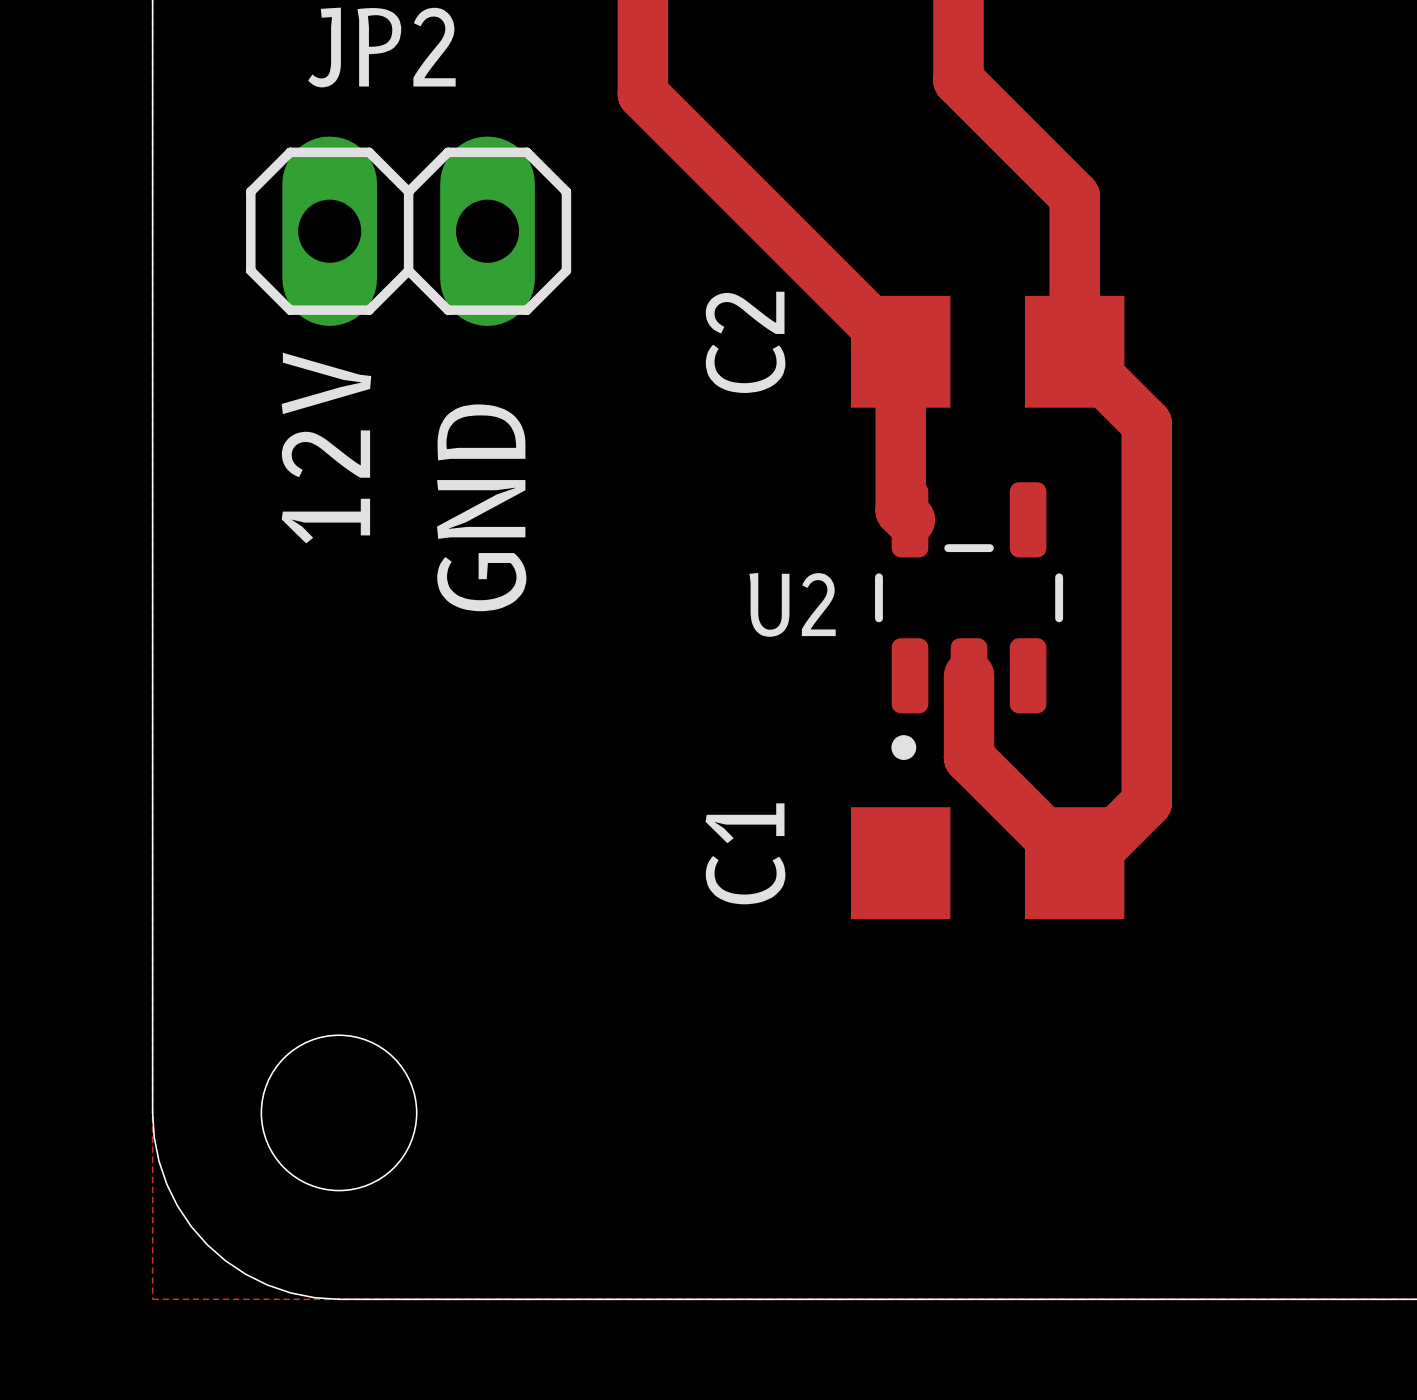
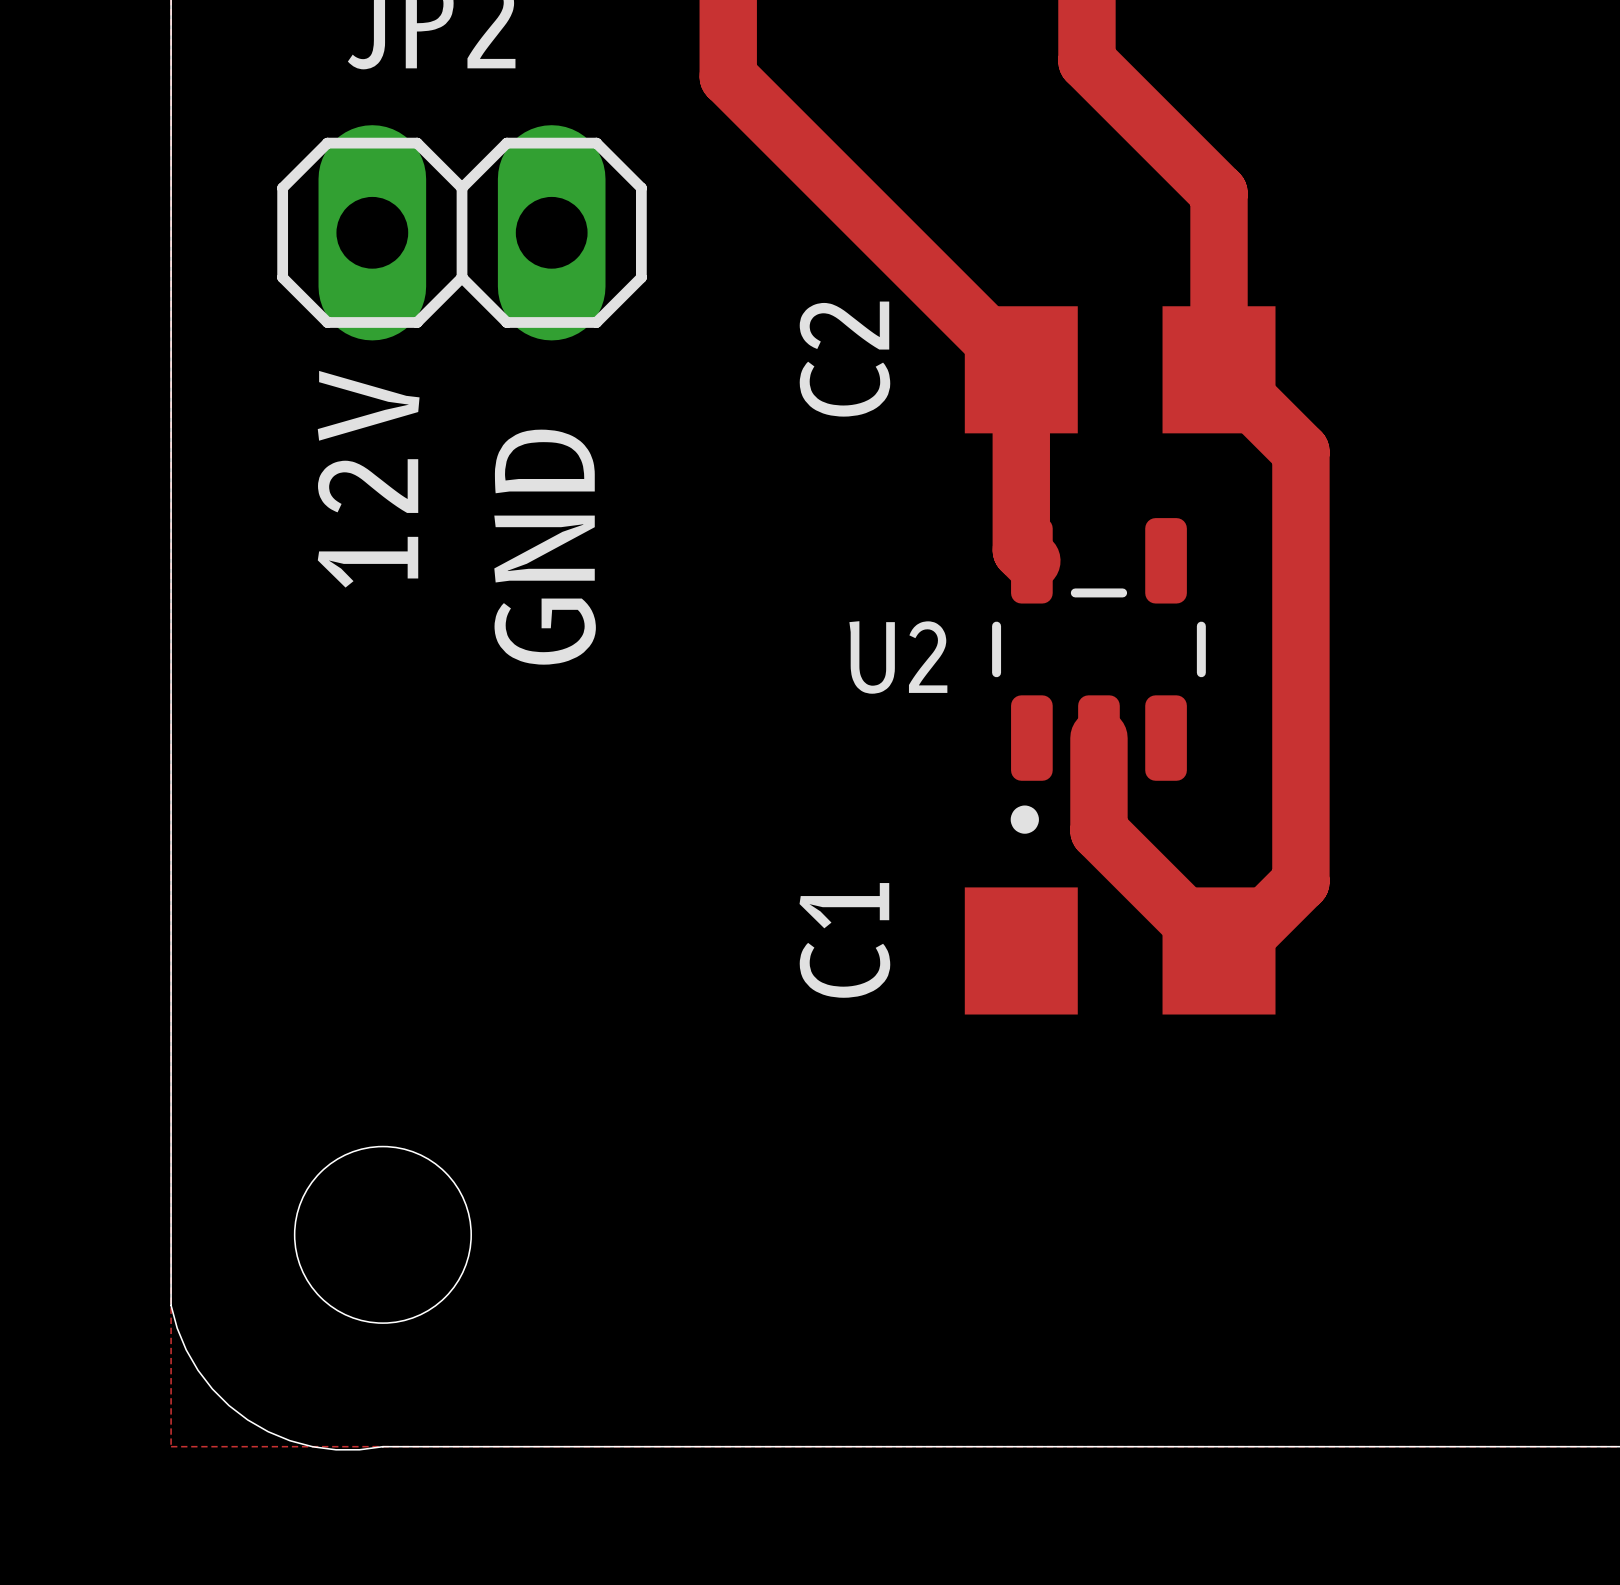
board edge: (152, 1112) (154, 1137) (158, 1161) (166, 1184) (177, 1206) (191, 1226) (207, 1244) (225, 1260) (245, 1274) (267, 1285) (290, 1292) (314, 1297) (339, 1299) -> (171, 1234) (171, 1305) (177, 1328) (186, 1349) (198, 1370) (212, 1388) (229, 1405) (247, 1419) (268, 1431) (289, 1440) (312, 1446) (336, 1449) (359, 1449) (382, 1446)

